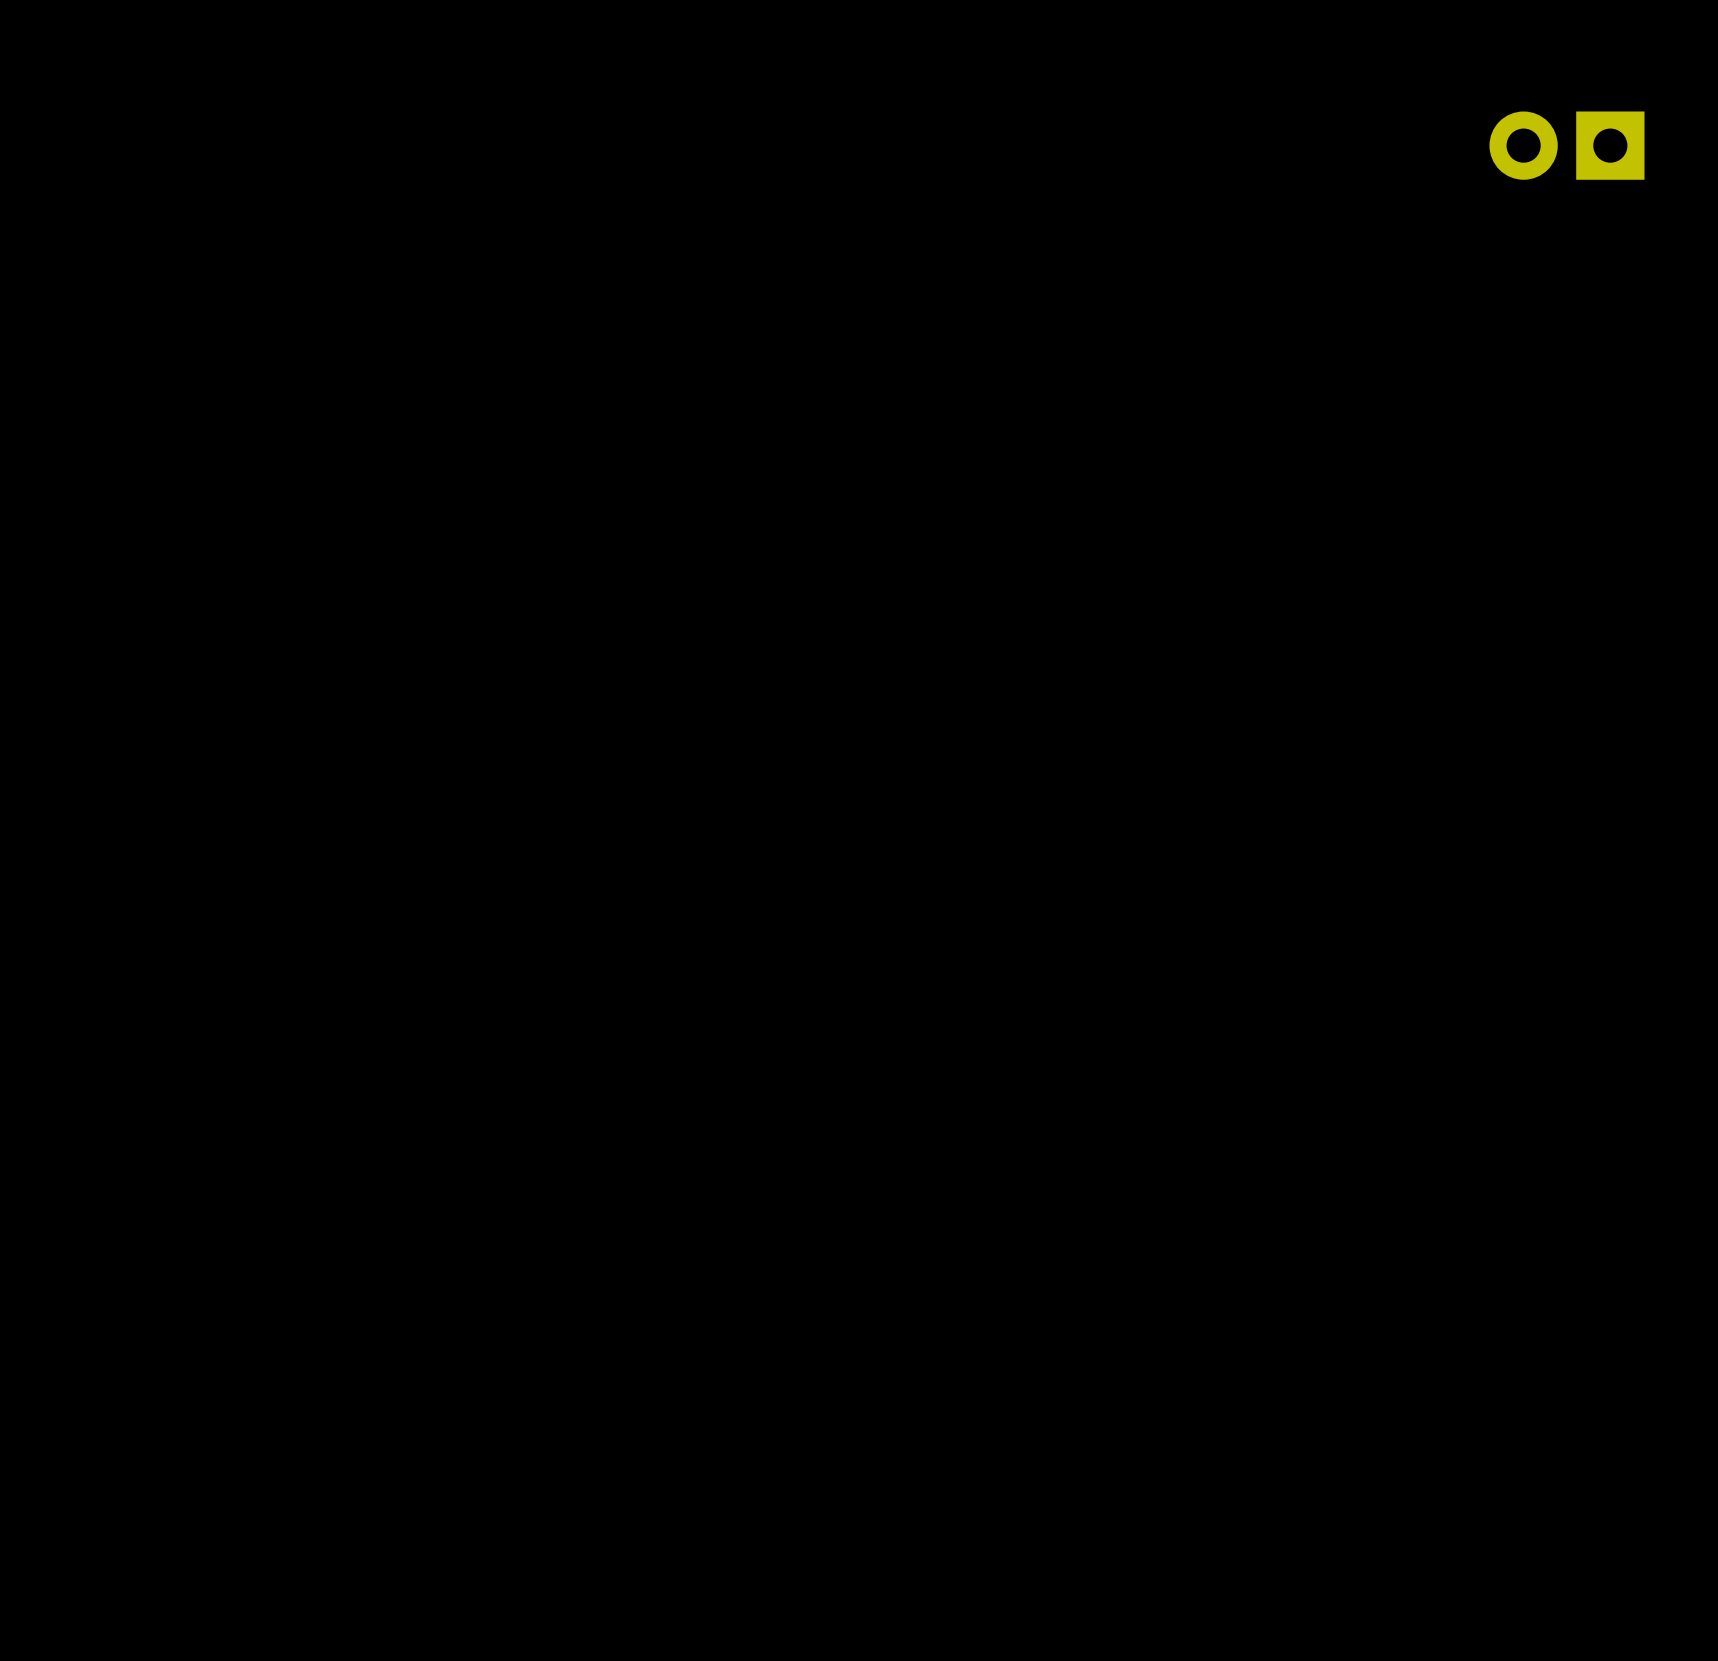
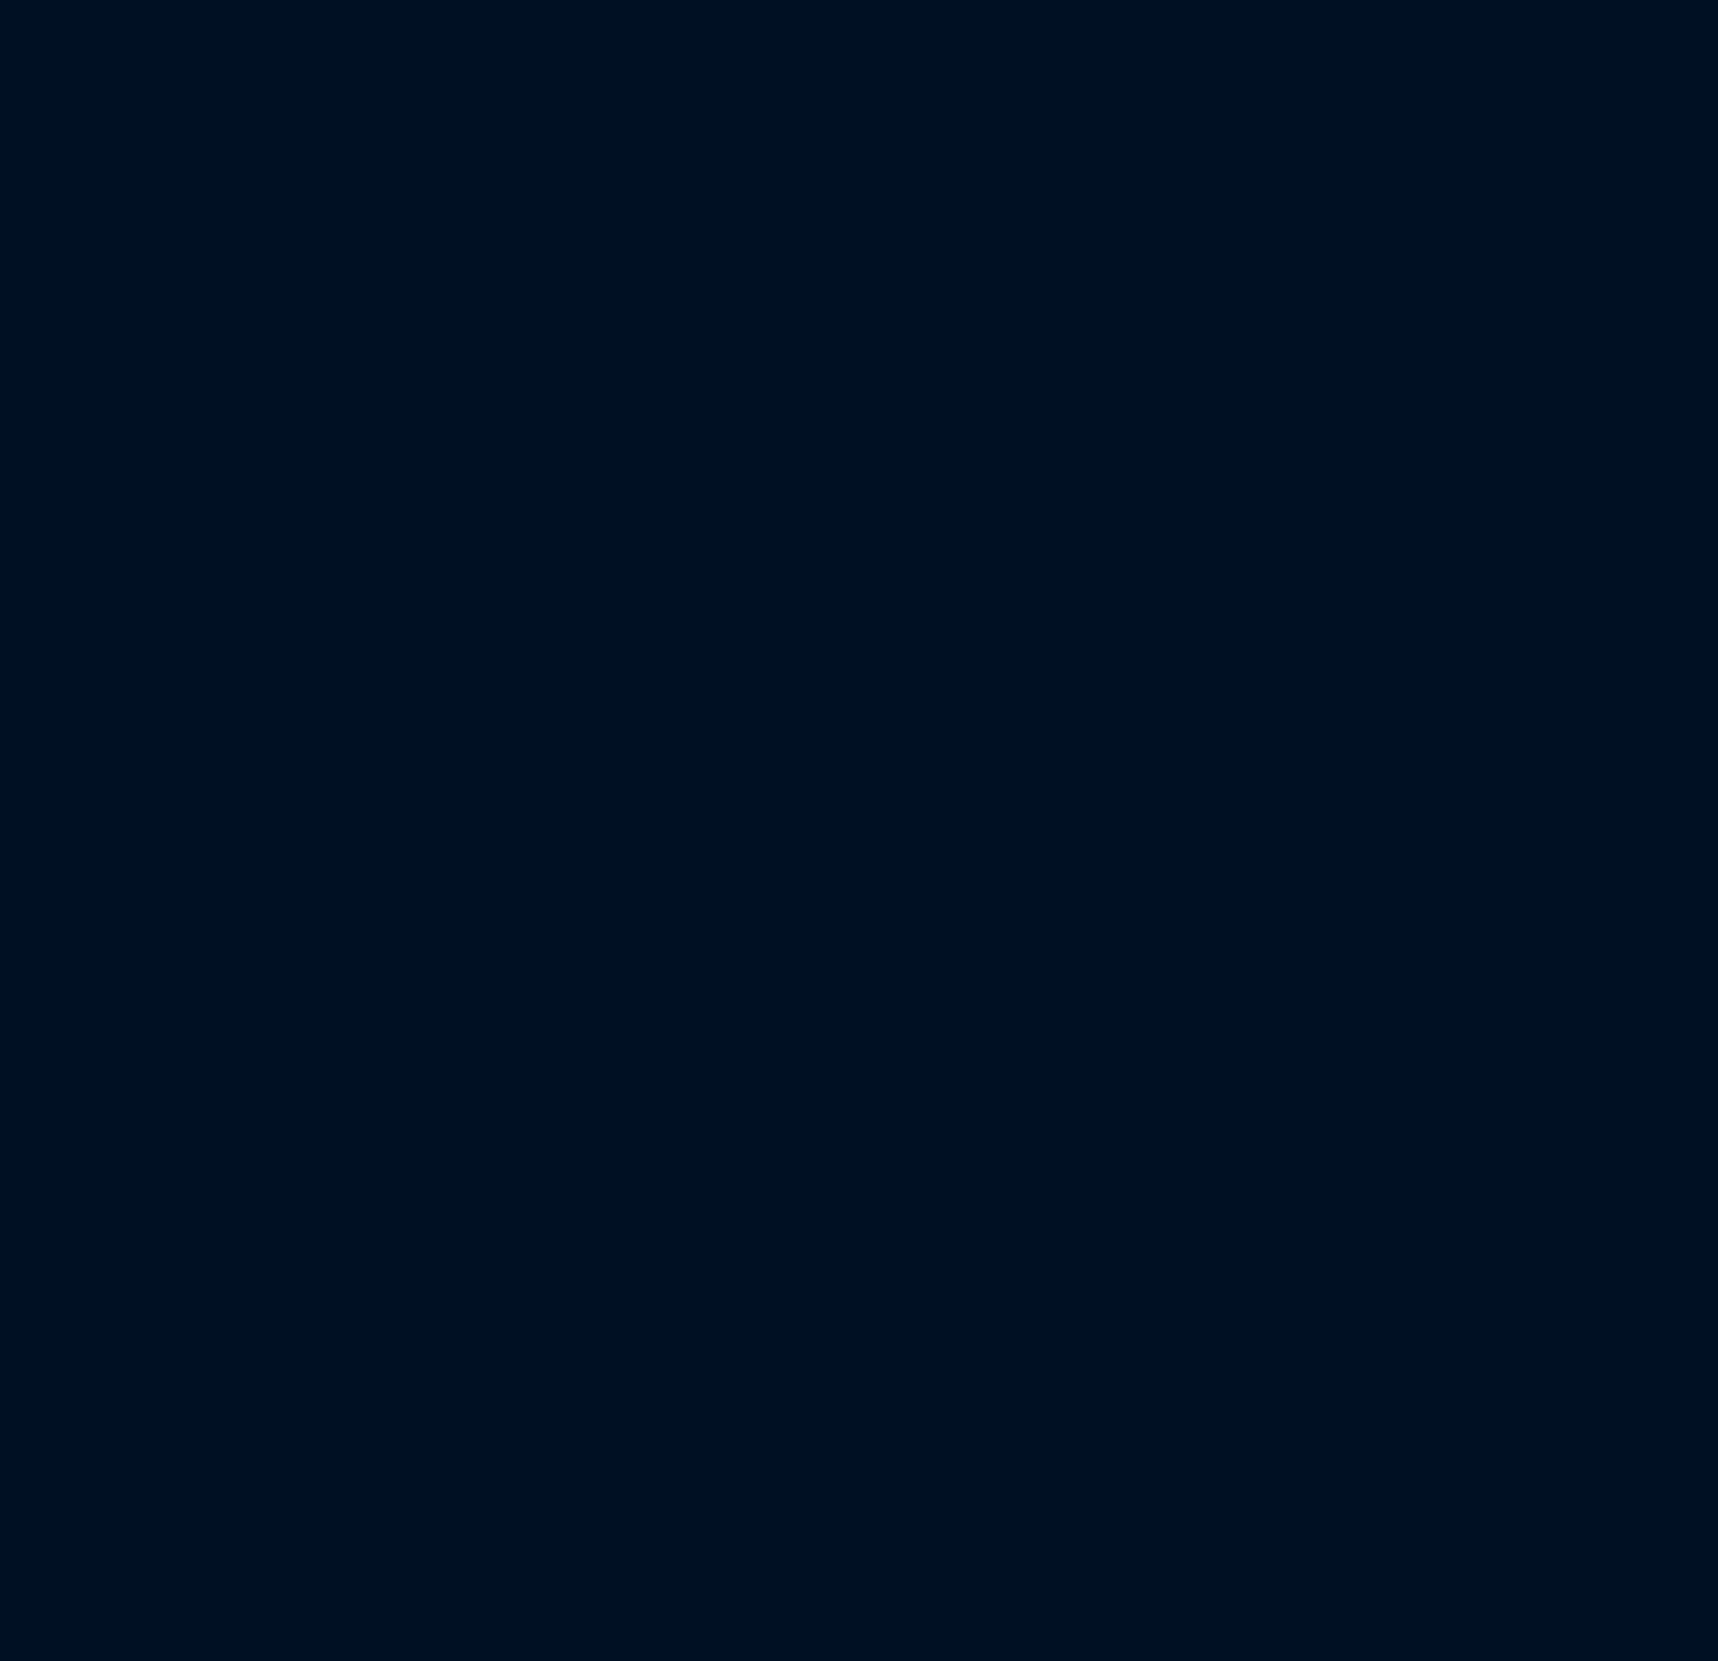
part: (1566, 145) -> none

